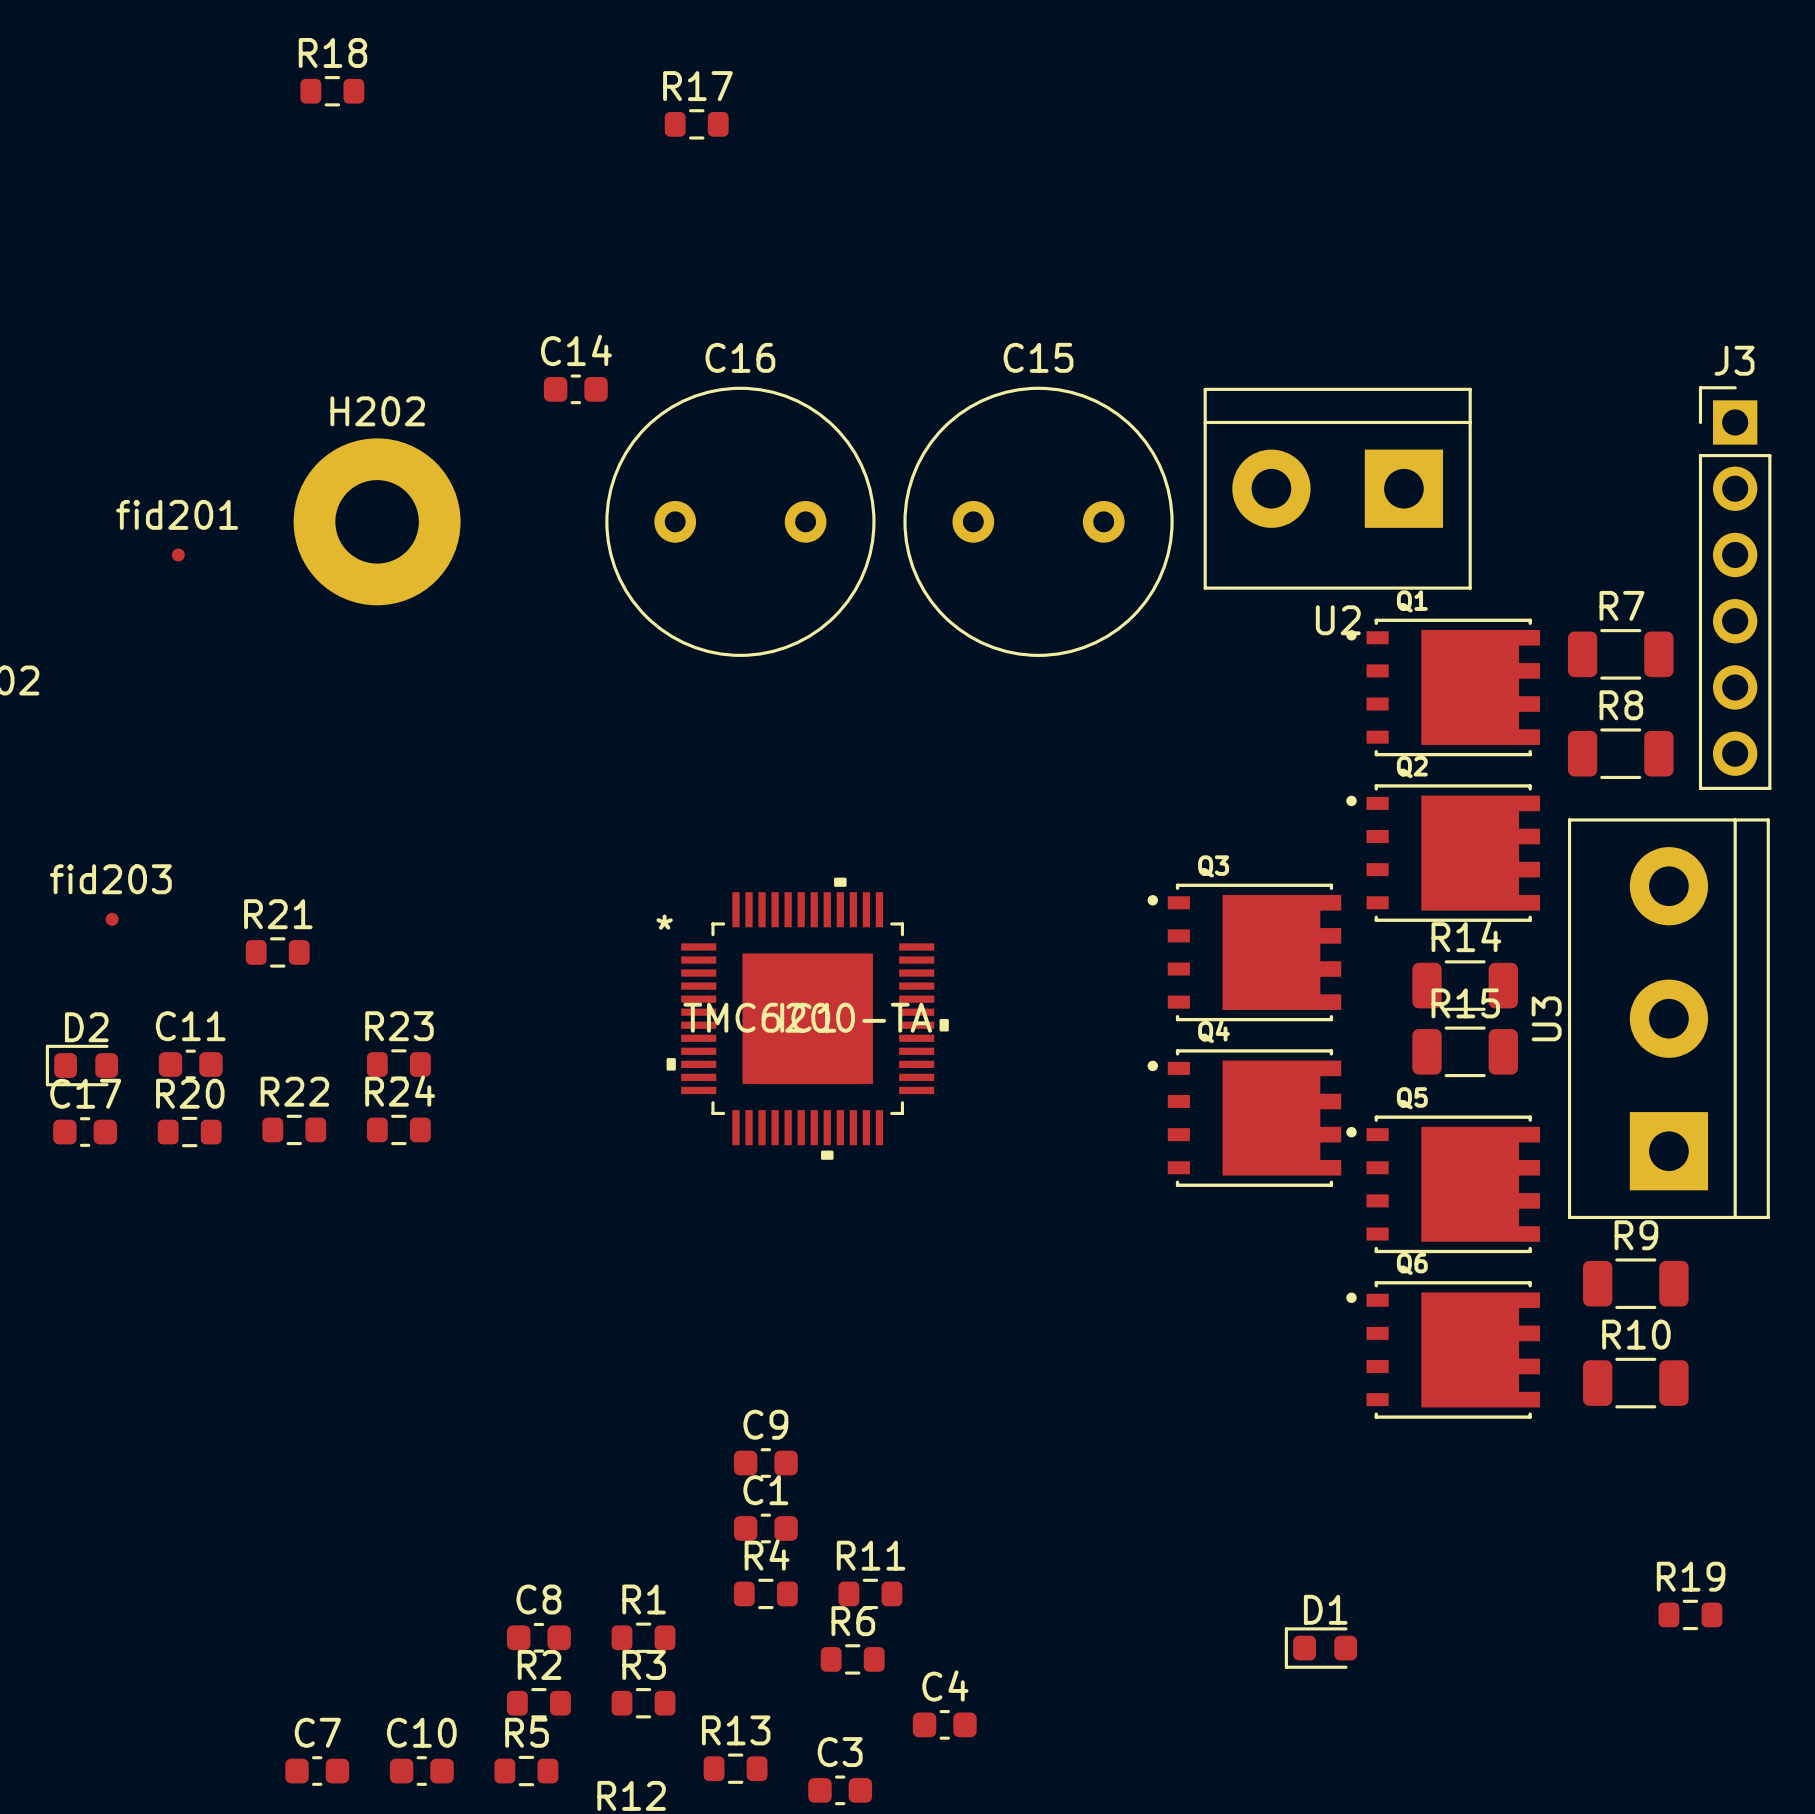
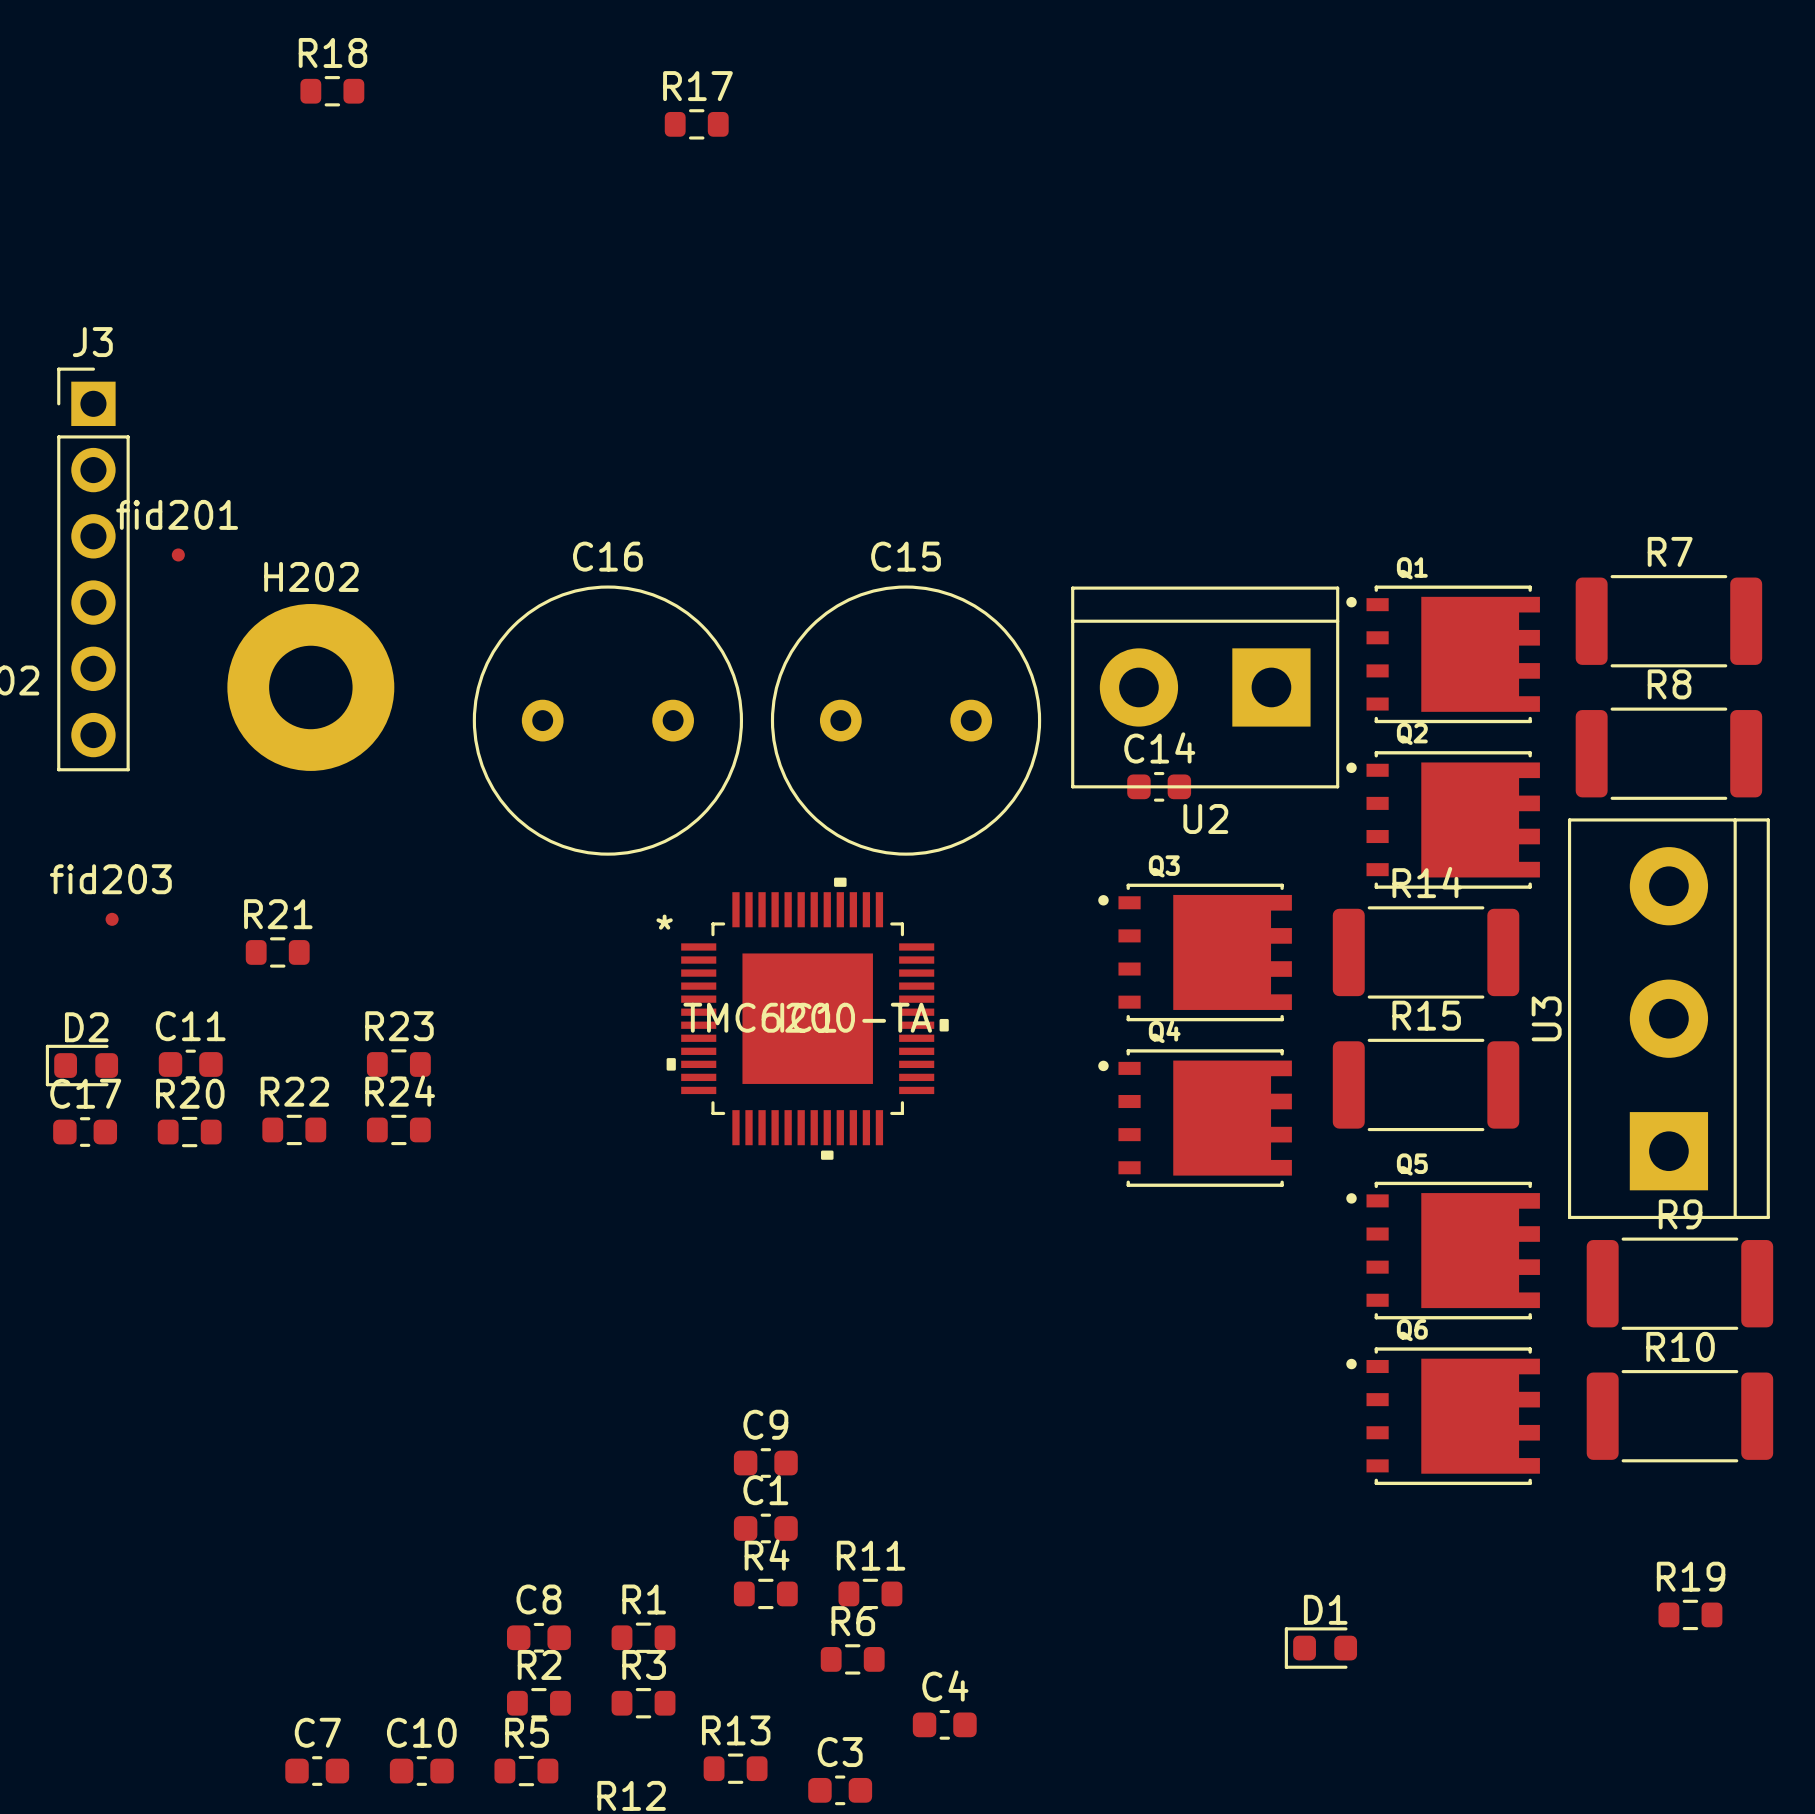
C14 position: (575, 389) -> (1159, 786)
U2 position: (1337, 488) -> (1205, 687)
H202 position: (377, 521) -> (310, 687)
C16 position: (740, 521) -> (607, 720)
C15 position: (1038, 521) -> (906, 720)
J3 position: (1735, 588) -> (93, 569)
R7 footprint: [1567, 629, 1674, 680] -> [1575, 575, 1763, 668]
Q1 position: (1443, 687) -> (1443, 654)
R8 footprint: [1567, 728, 1674, 780] -> [1575, 707, 1763, 800]
Q2 position: (1443, 853) -> (1443, 819)
Q3 position: (1244, 952) -> (1195, 952)
R14 footprint: [1412, 960, 1518, 1011] -> [1332, 906, 1520, 999]
R15 footprint: [1412, 1026, 1518, 1078] -> [1332, 1038, 1520, 1132]
Q4 position: (1244, 1118) -> (1195, 1118)
Q5 position: (1443, 1184) -> (1443, 1250)
R9 footprint: [1582, 1258, 1689, 1310] -> [1586, 1237, 1774, 1330]
Q6 position: (1443, 1349) -> (1443, 1416)
R10 footprint: [1582, 1357, 1689, 1409] -> [1586, 1370, 1774, 1463]

